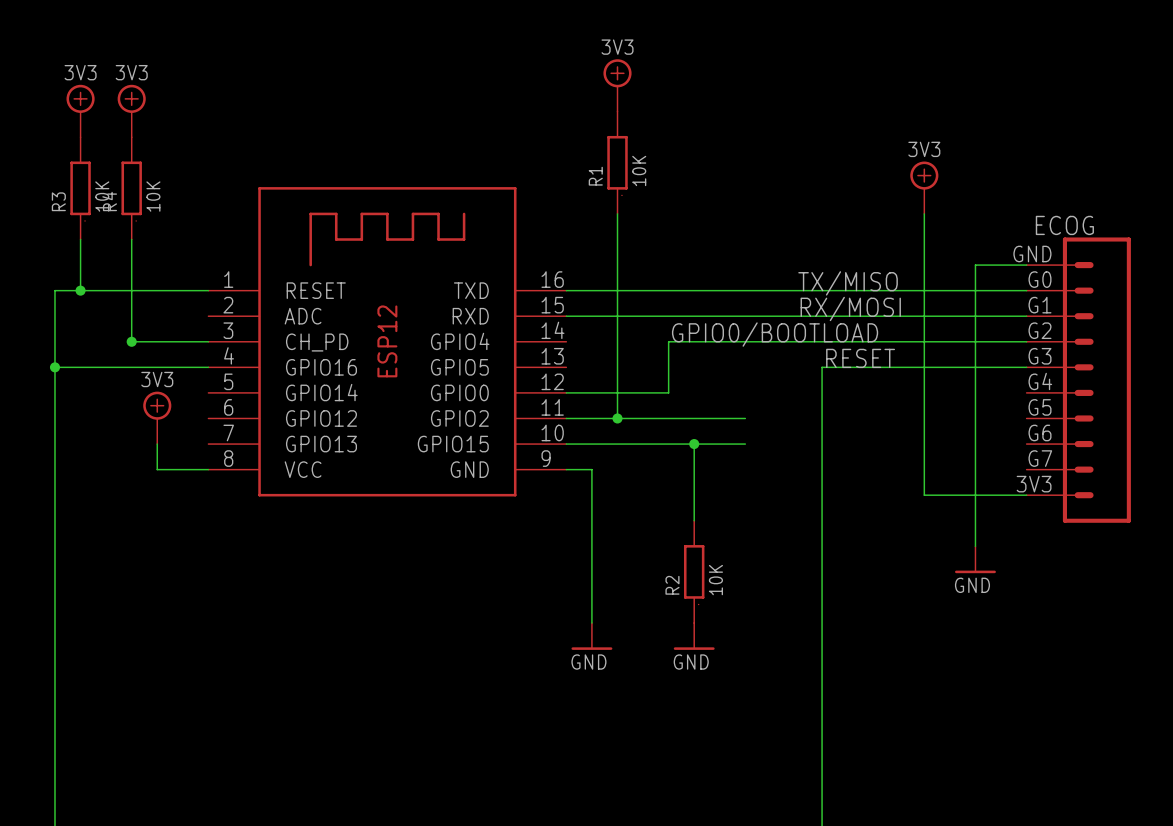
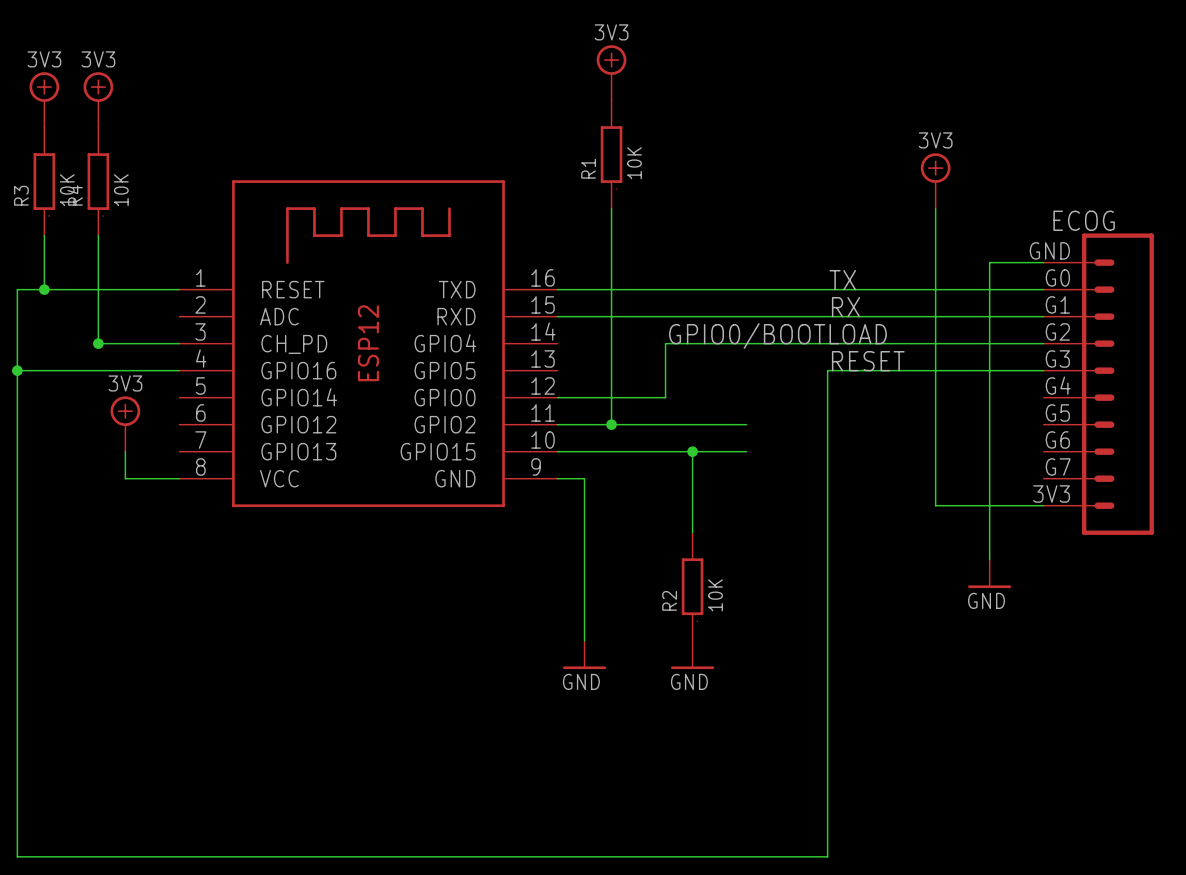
label: none -> TX (842, 280)
label: TX/MISO (848, 283) -> none
label: none -> RX (846, 307)
label: RX/MOSI (850, 308) -> none

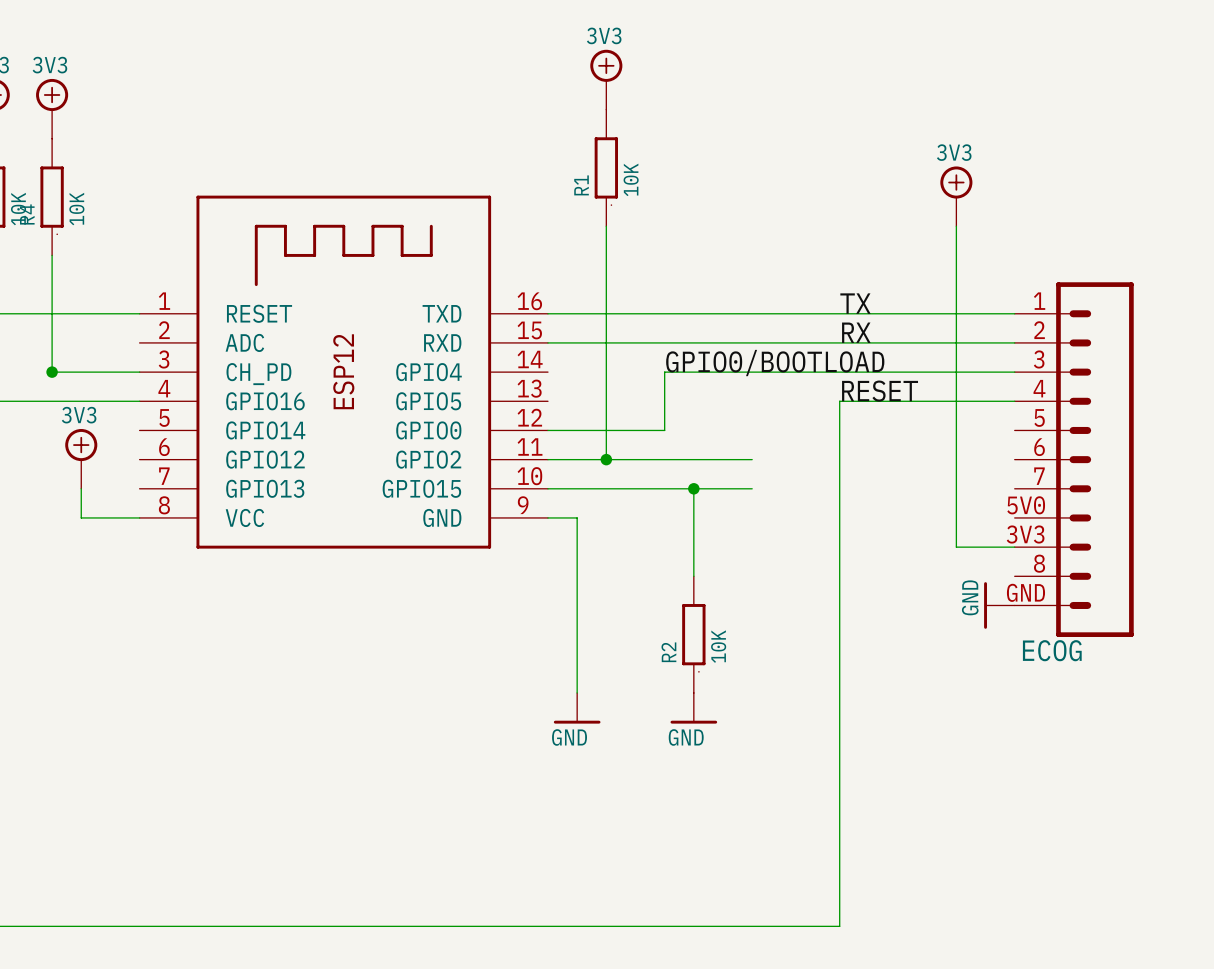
wire: (1043, 262) (989, 262) (989, 559) -> none
ECOG: (1098, 384) -> none
ECOG: none -> (1074, 459)
power symbol rotation: 0° (989, 586) -> 90° clockwise (985, 605)

